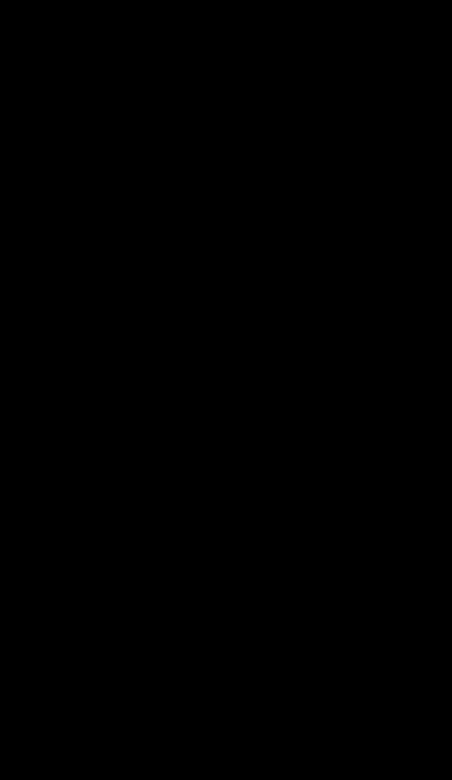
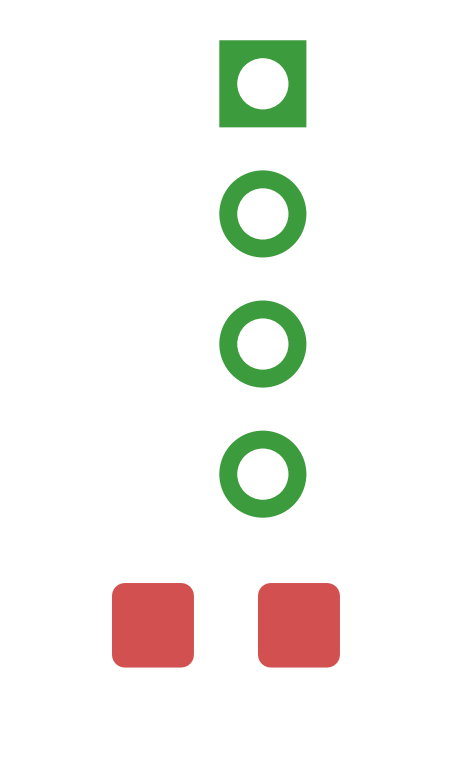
part: none -> (262, 278)
part: none -> (225, 625)

